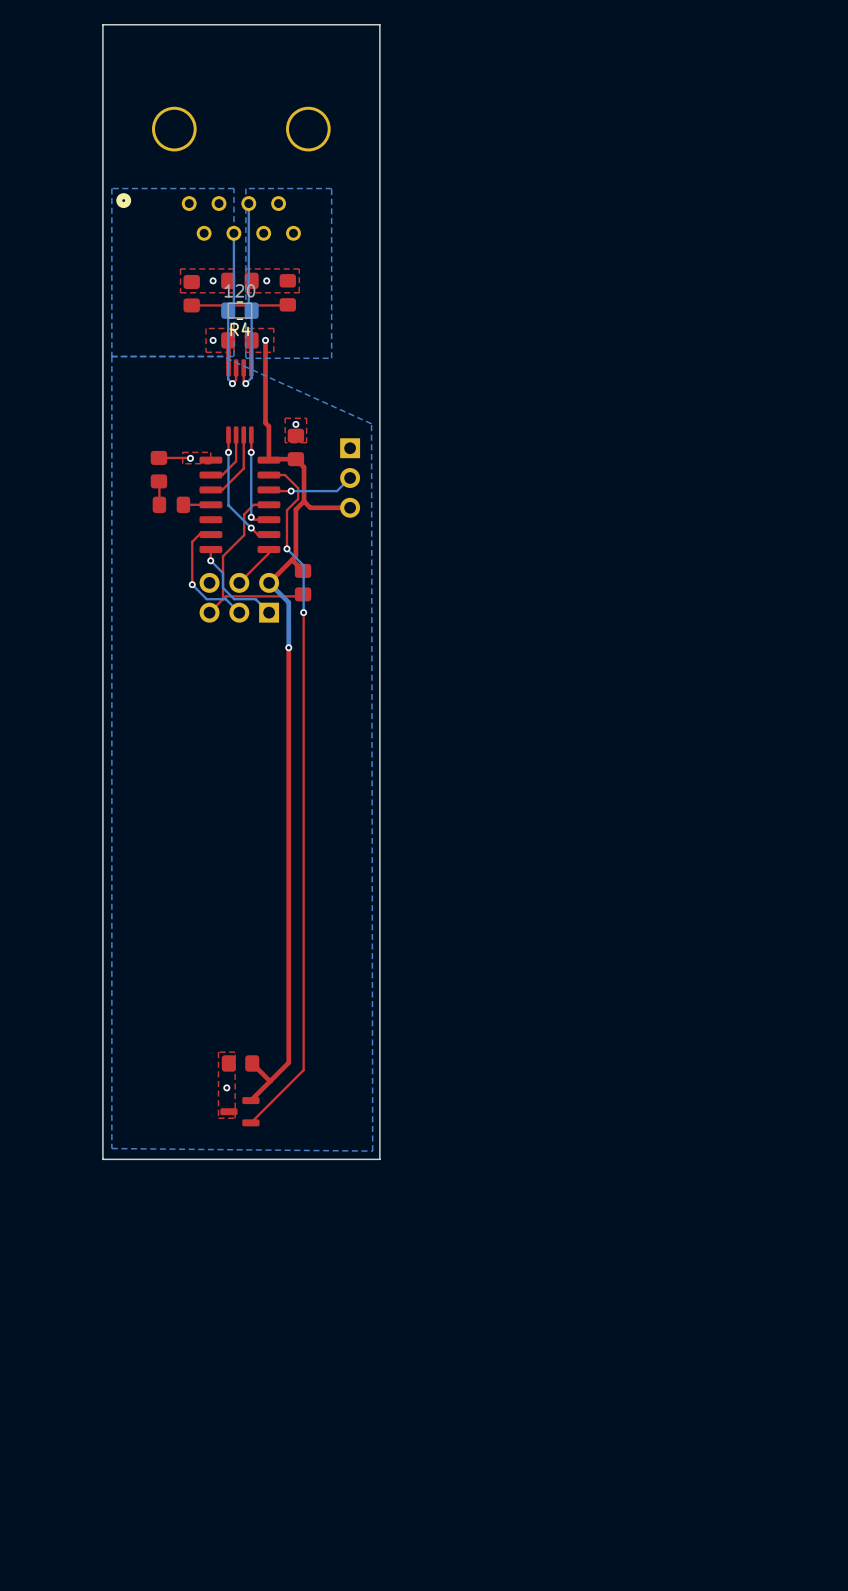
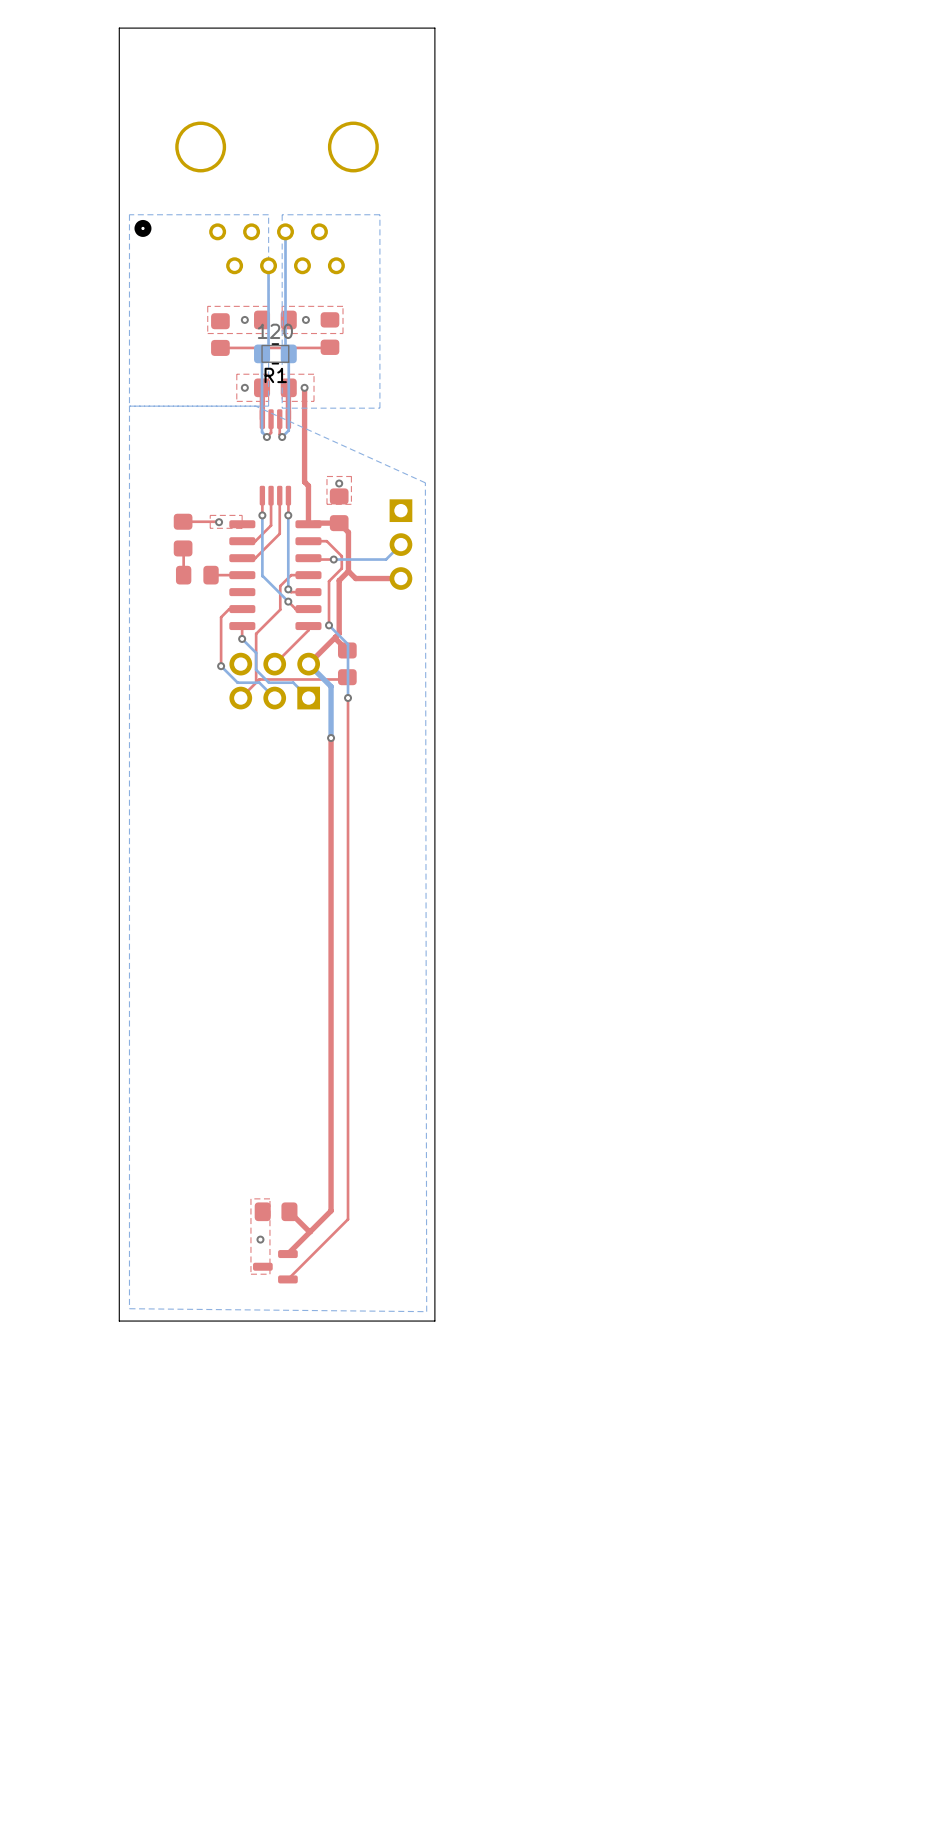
R4 name: R4 (240, 329) -> R1 (275, 375)

